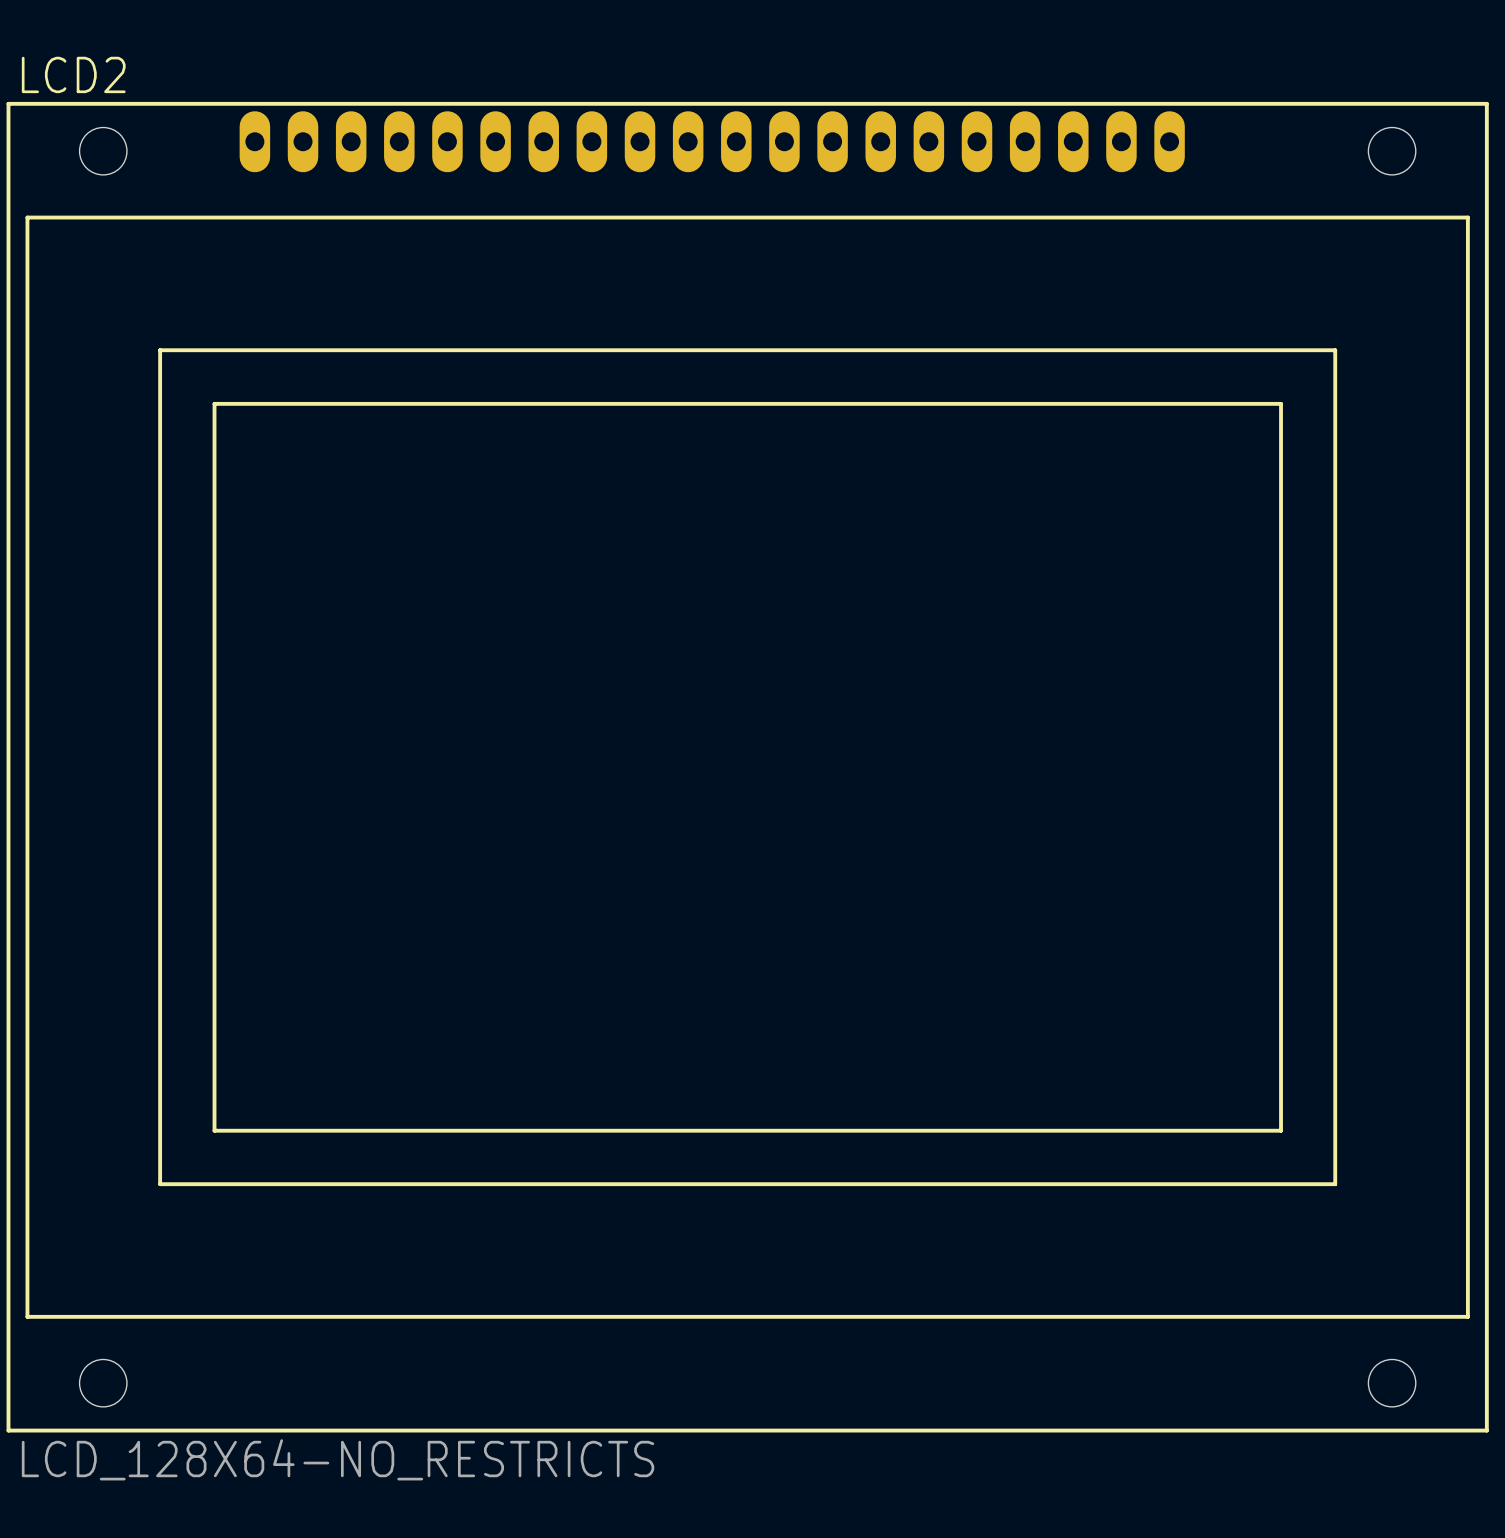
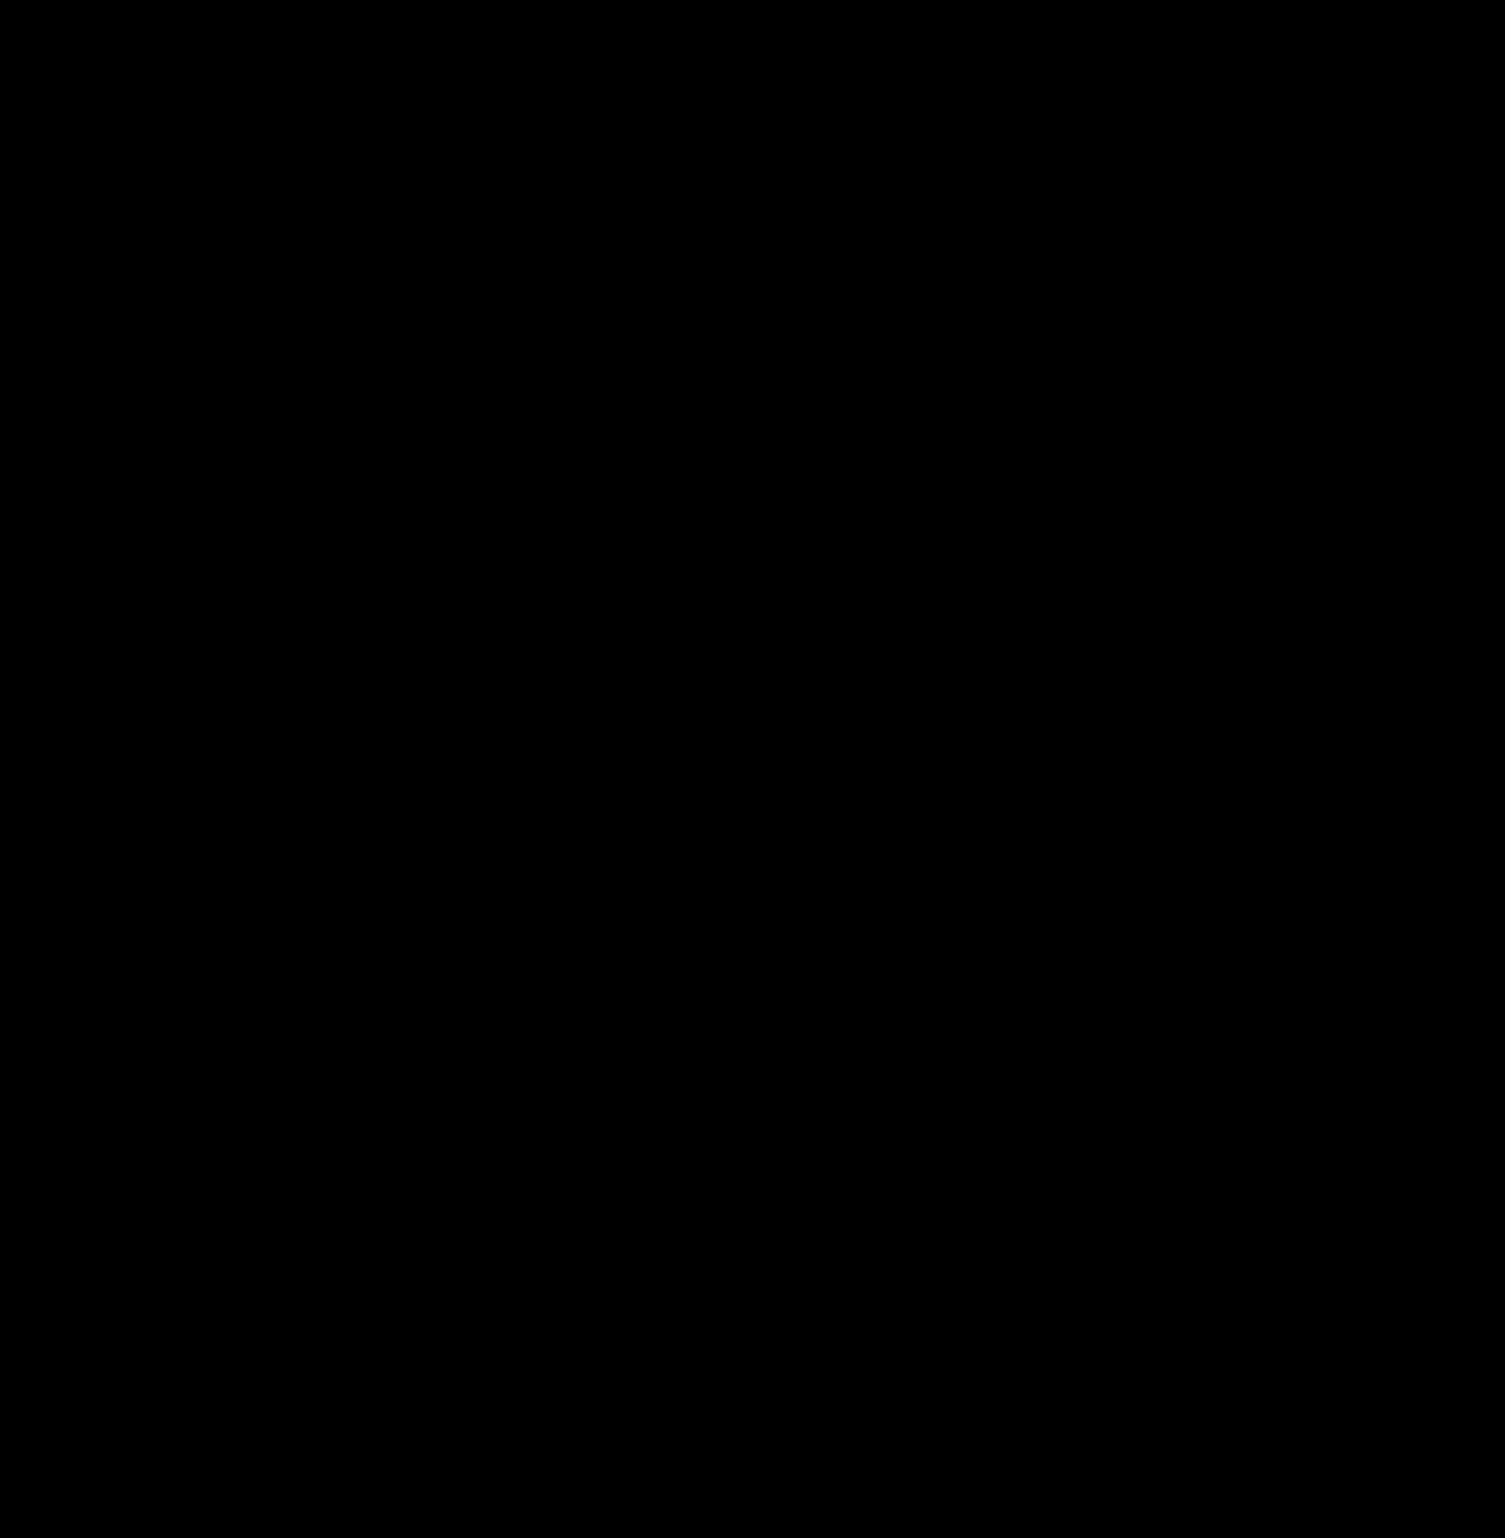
LCD2: LCD_128X64-NO_RESTRICTS (747, 767) -> none

